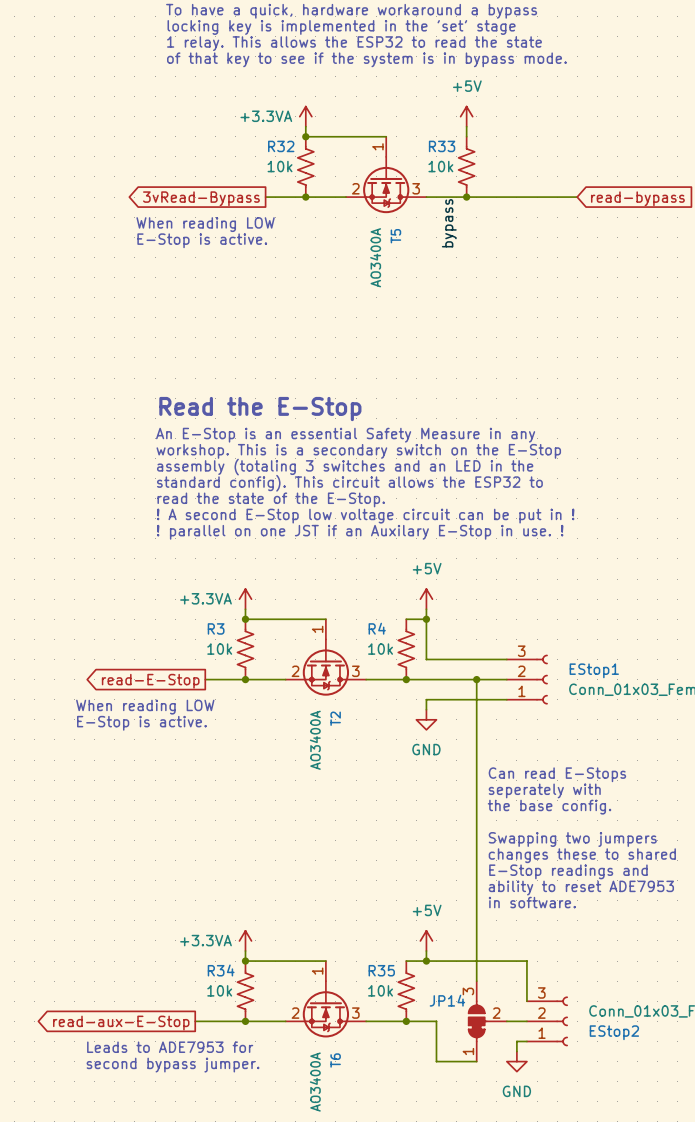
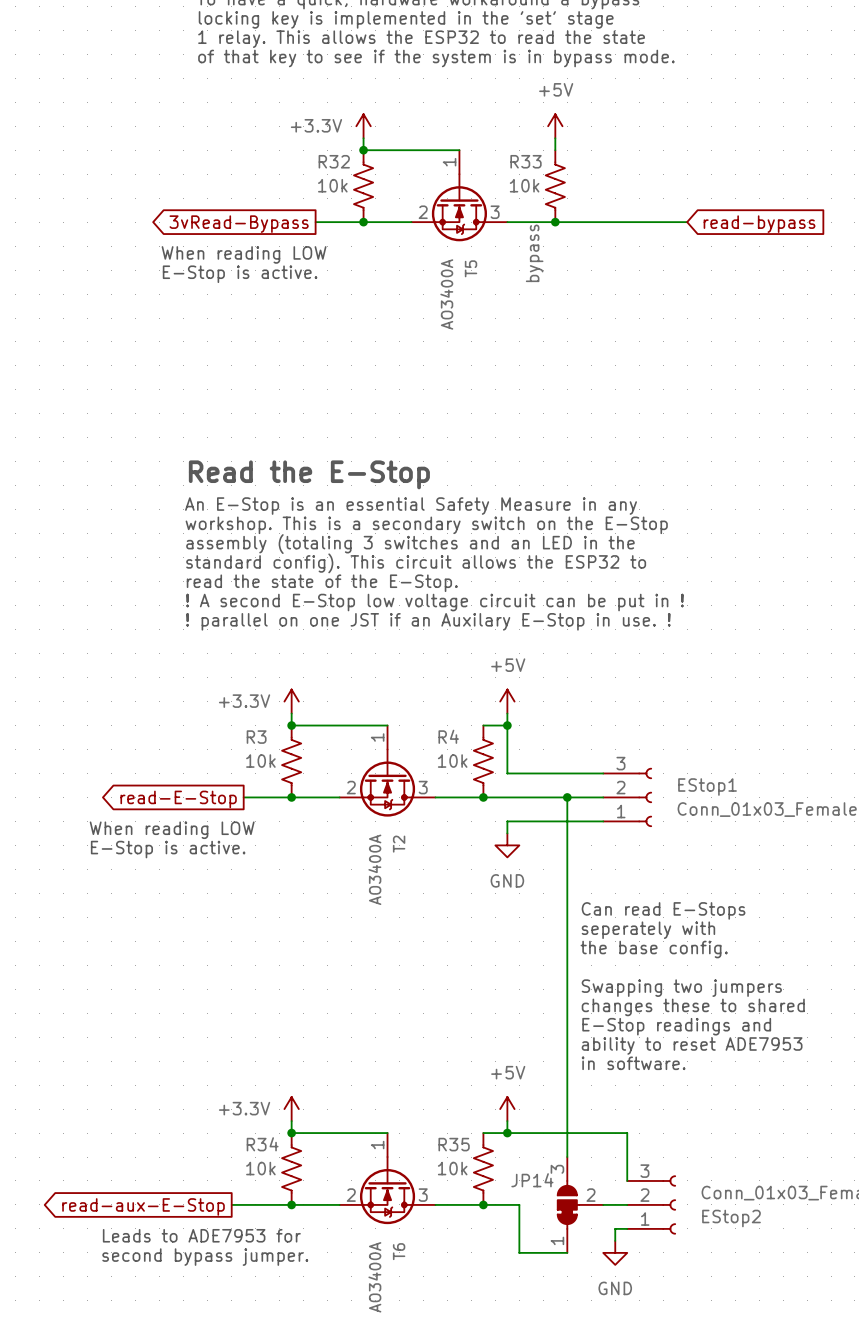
power symbol: +3.3VA (305, 116) -> +3.3V (363, 126)
power symbol: +3.3VA (245, 599) -> +3.3V (291, 701)
power symbol: +3.3VA (245, 940) -> +3.3V (291, 1109)

